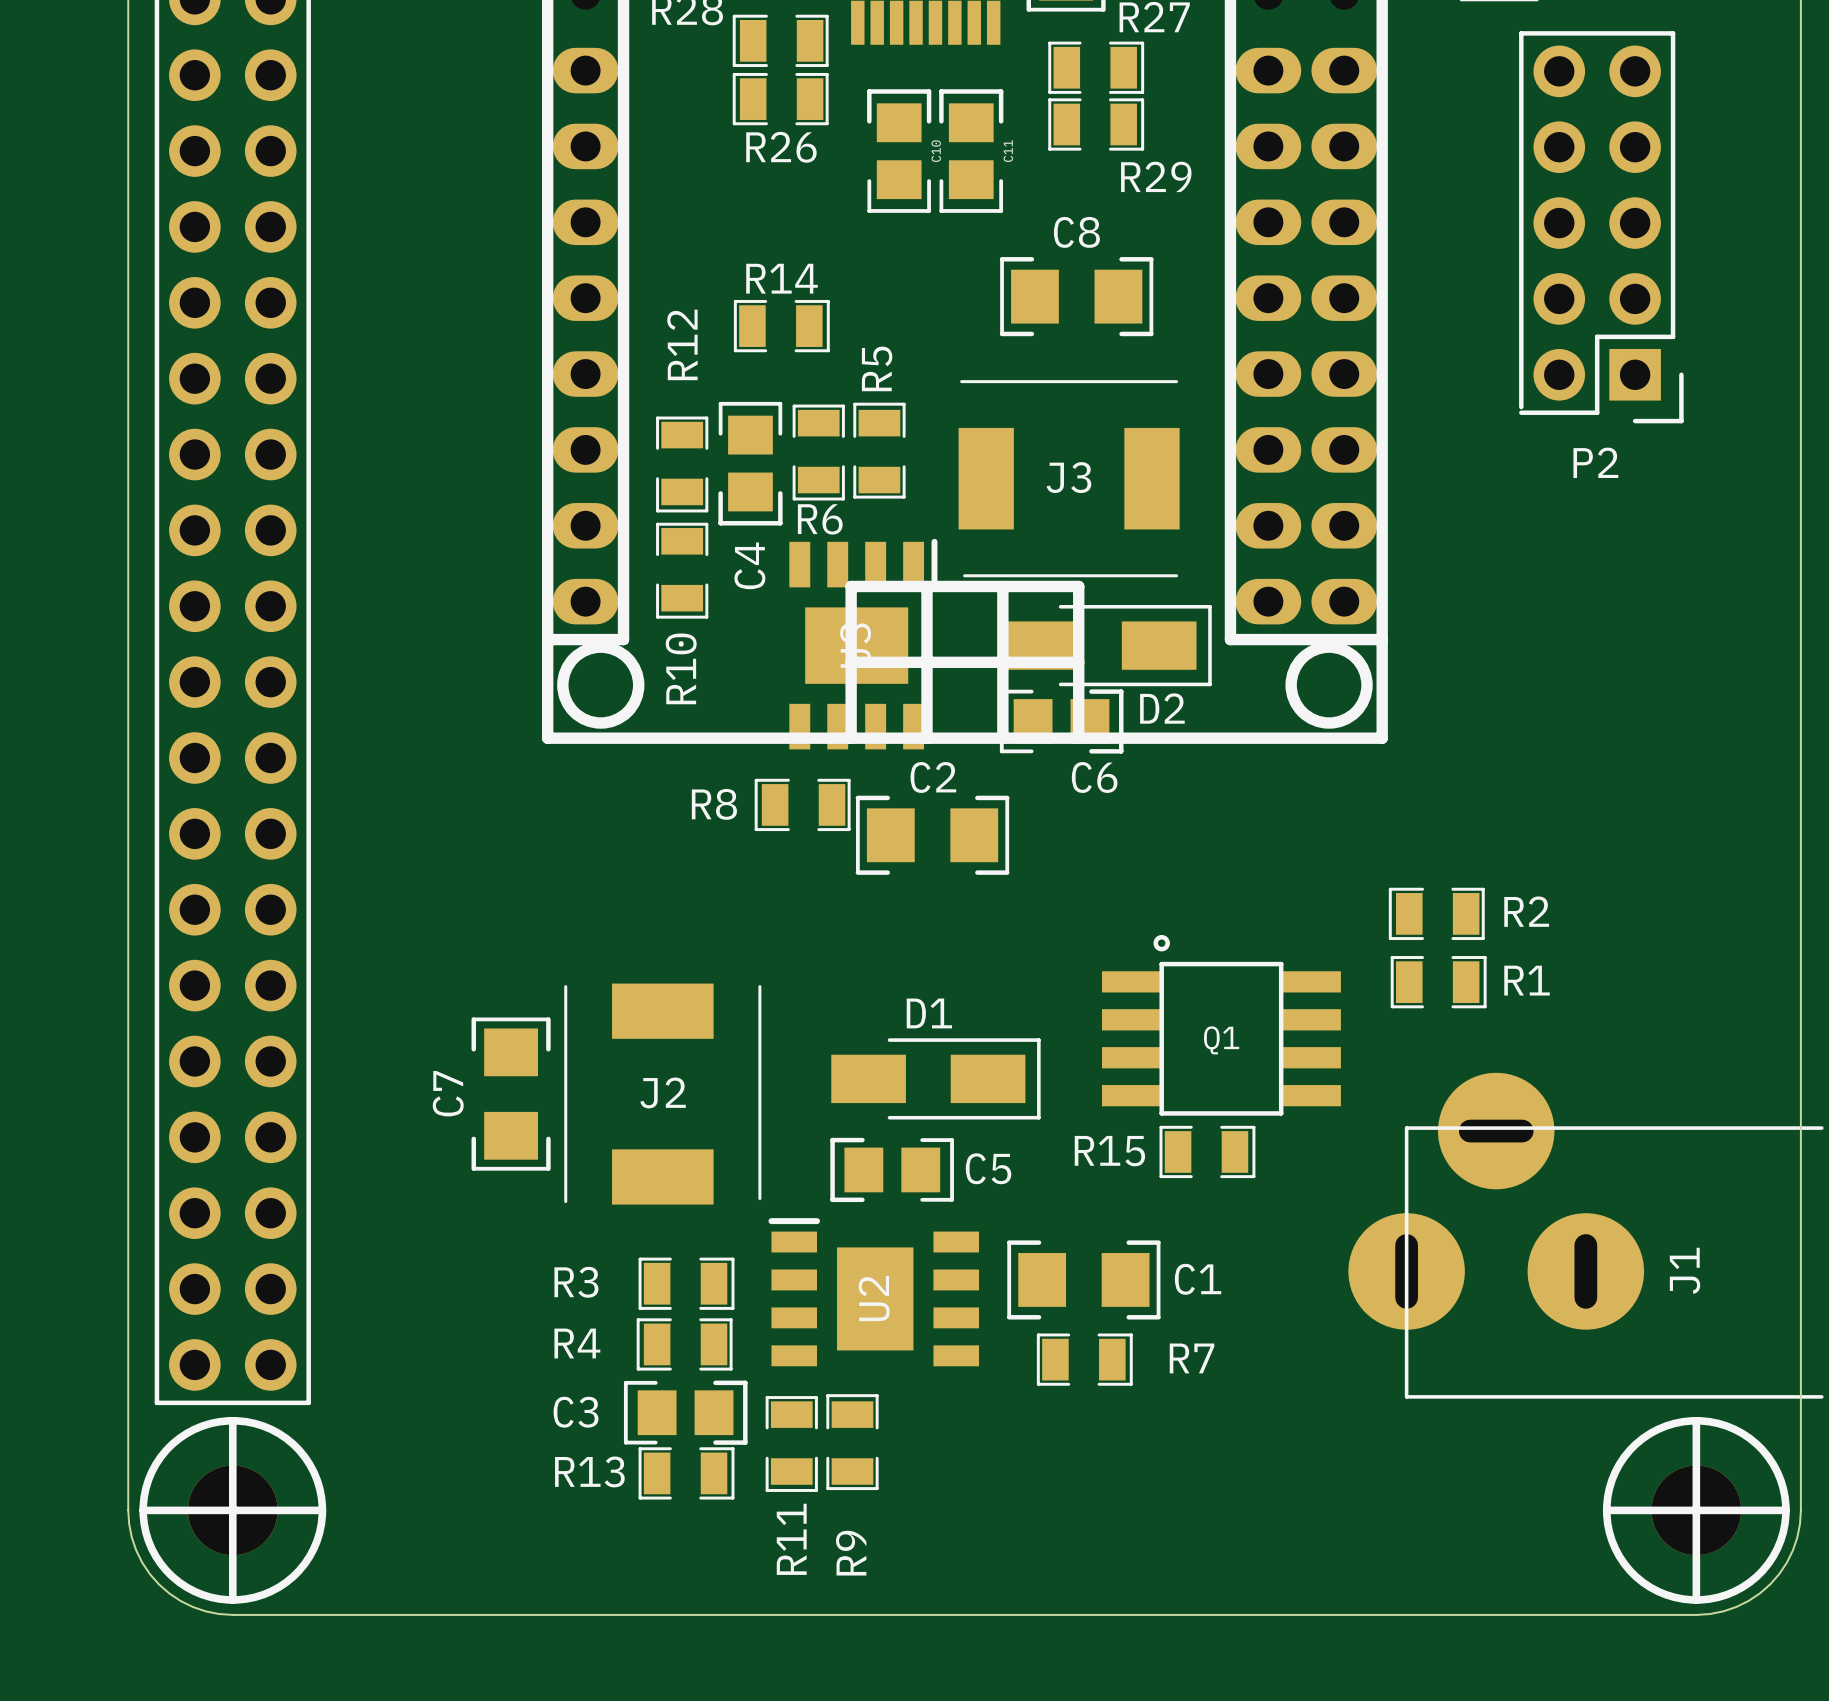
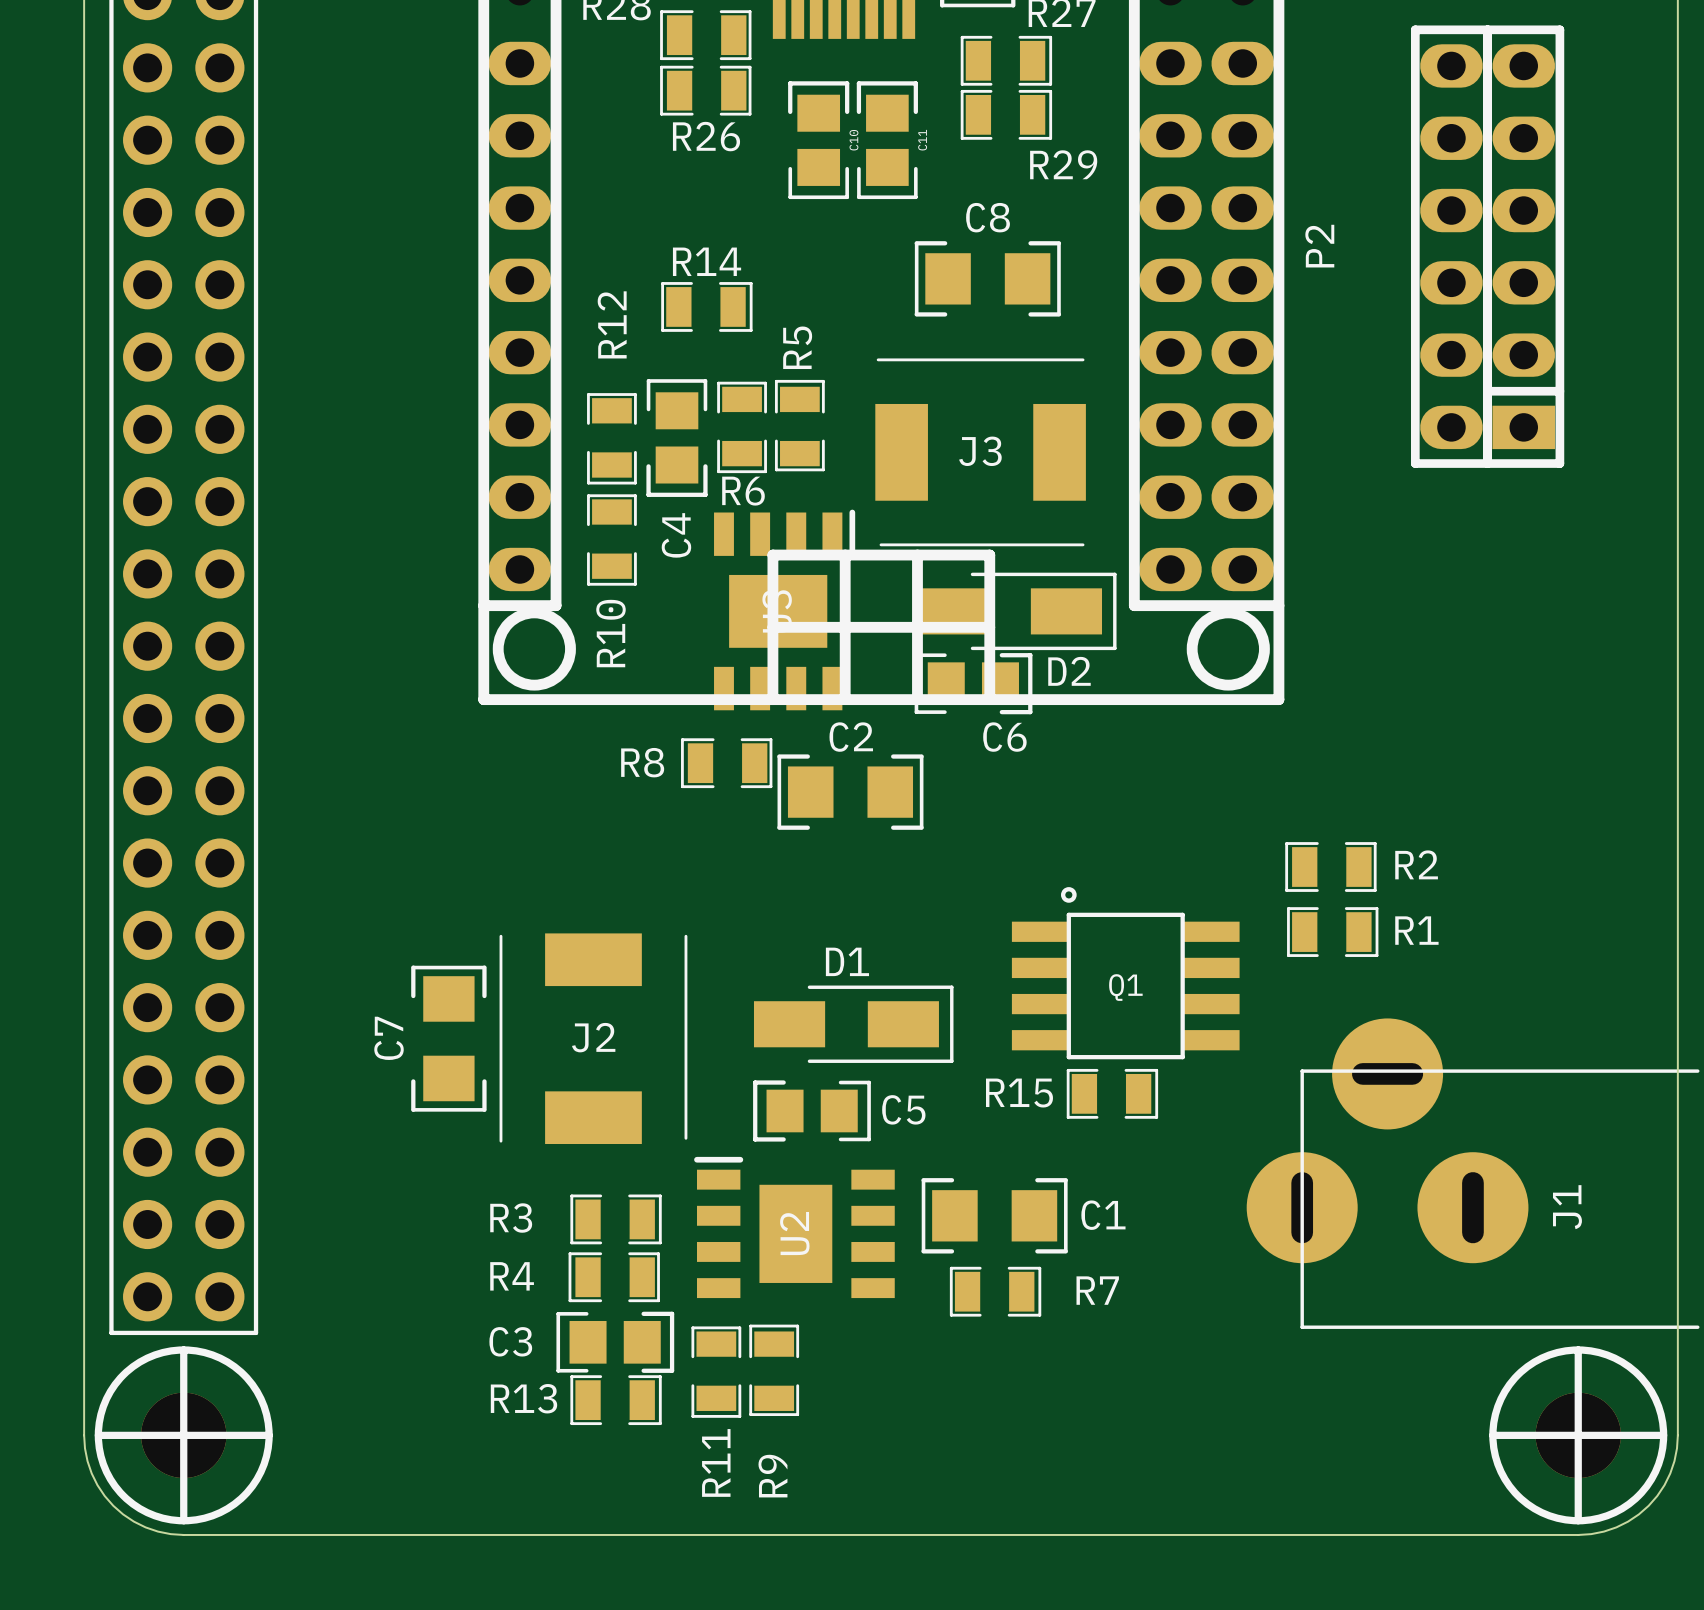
P2 footprint: [1519, 31, 1684, 424] -> [1410, 25, 1565, 468]
P2 name position: P2 (1595, 462) -> P2 (1319, 246)

